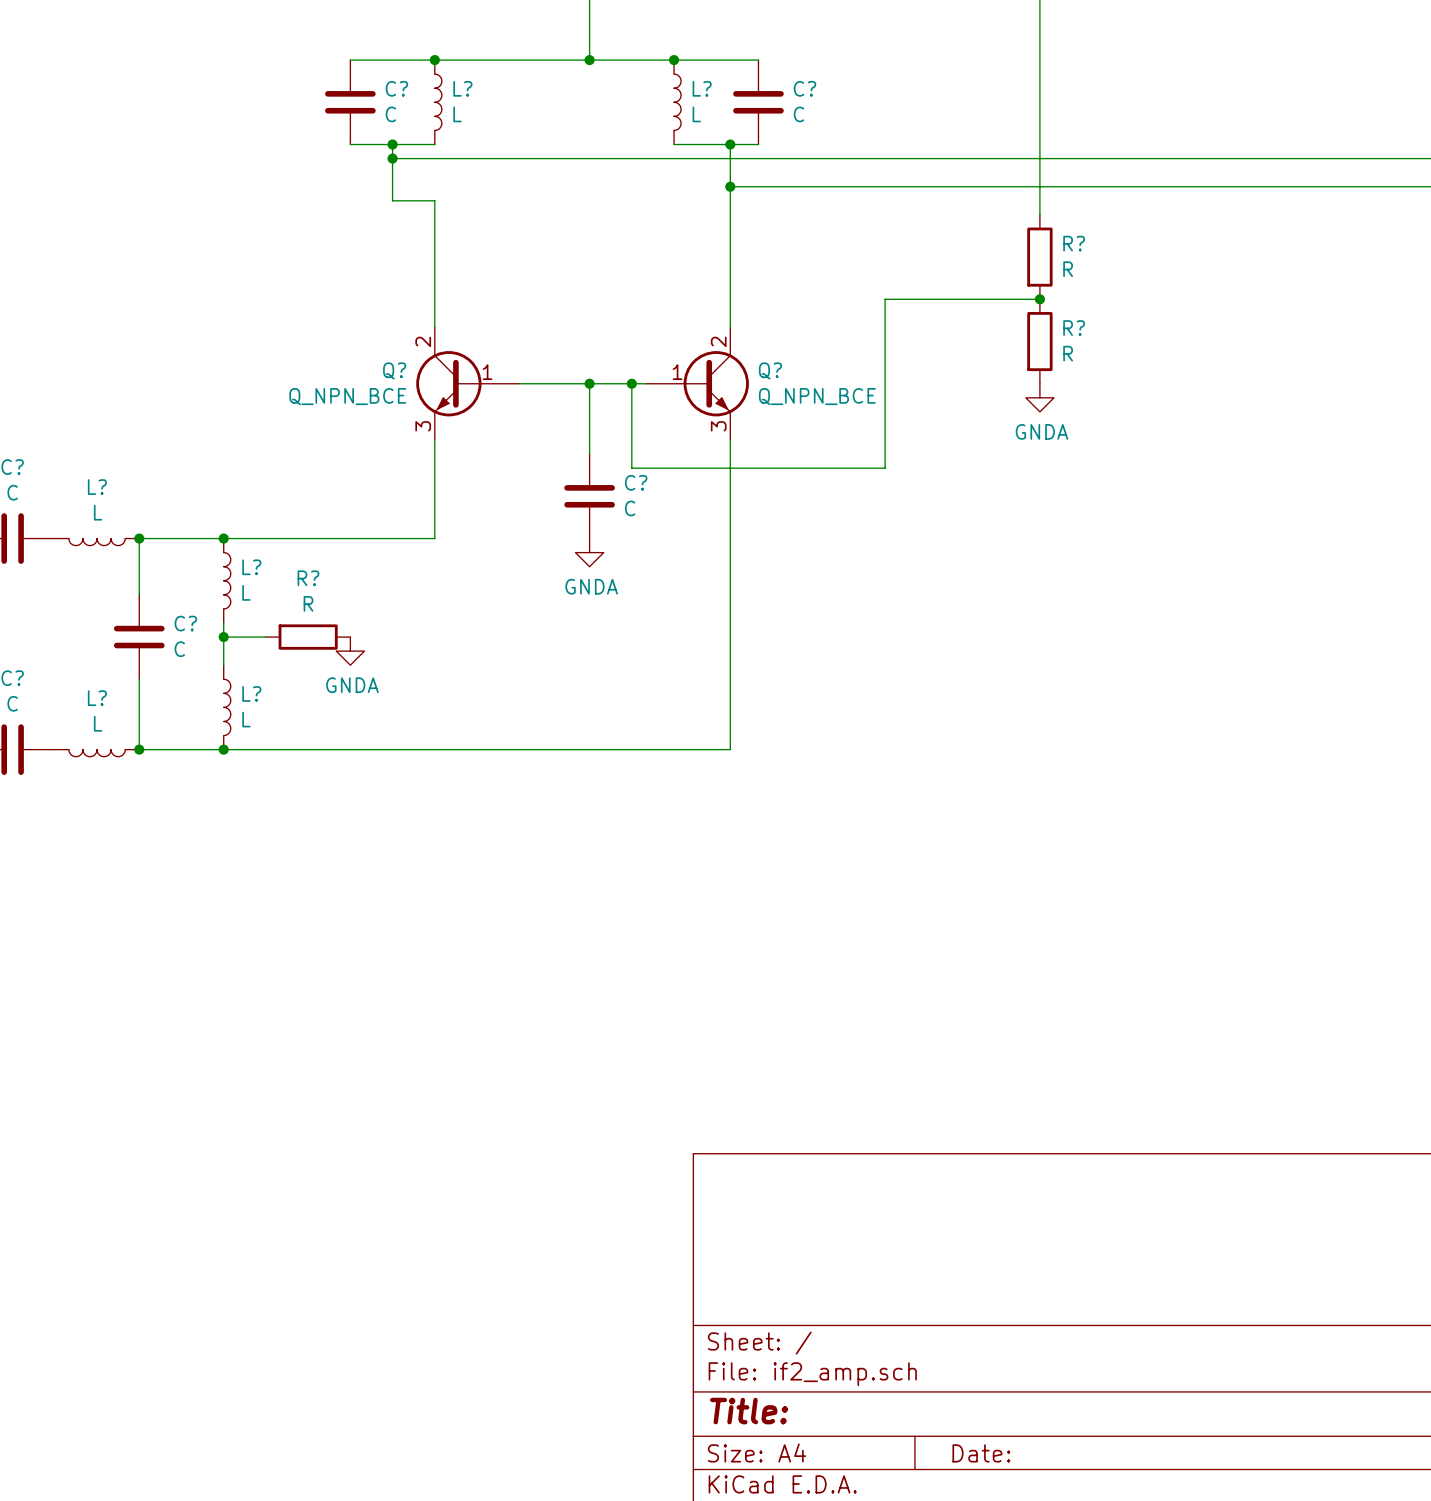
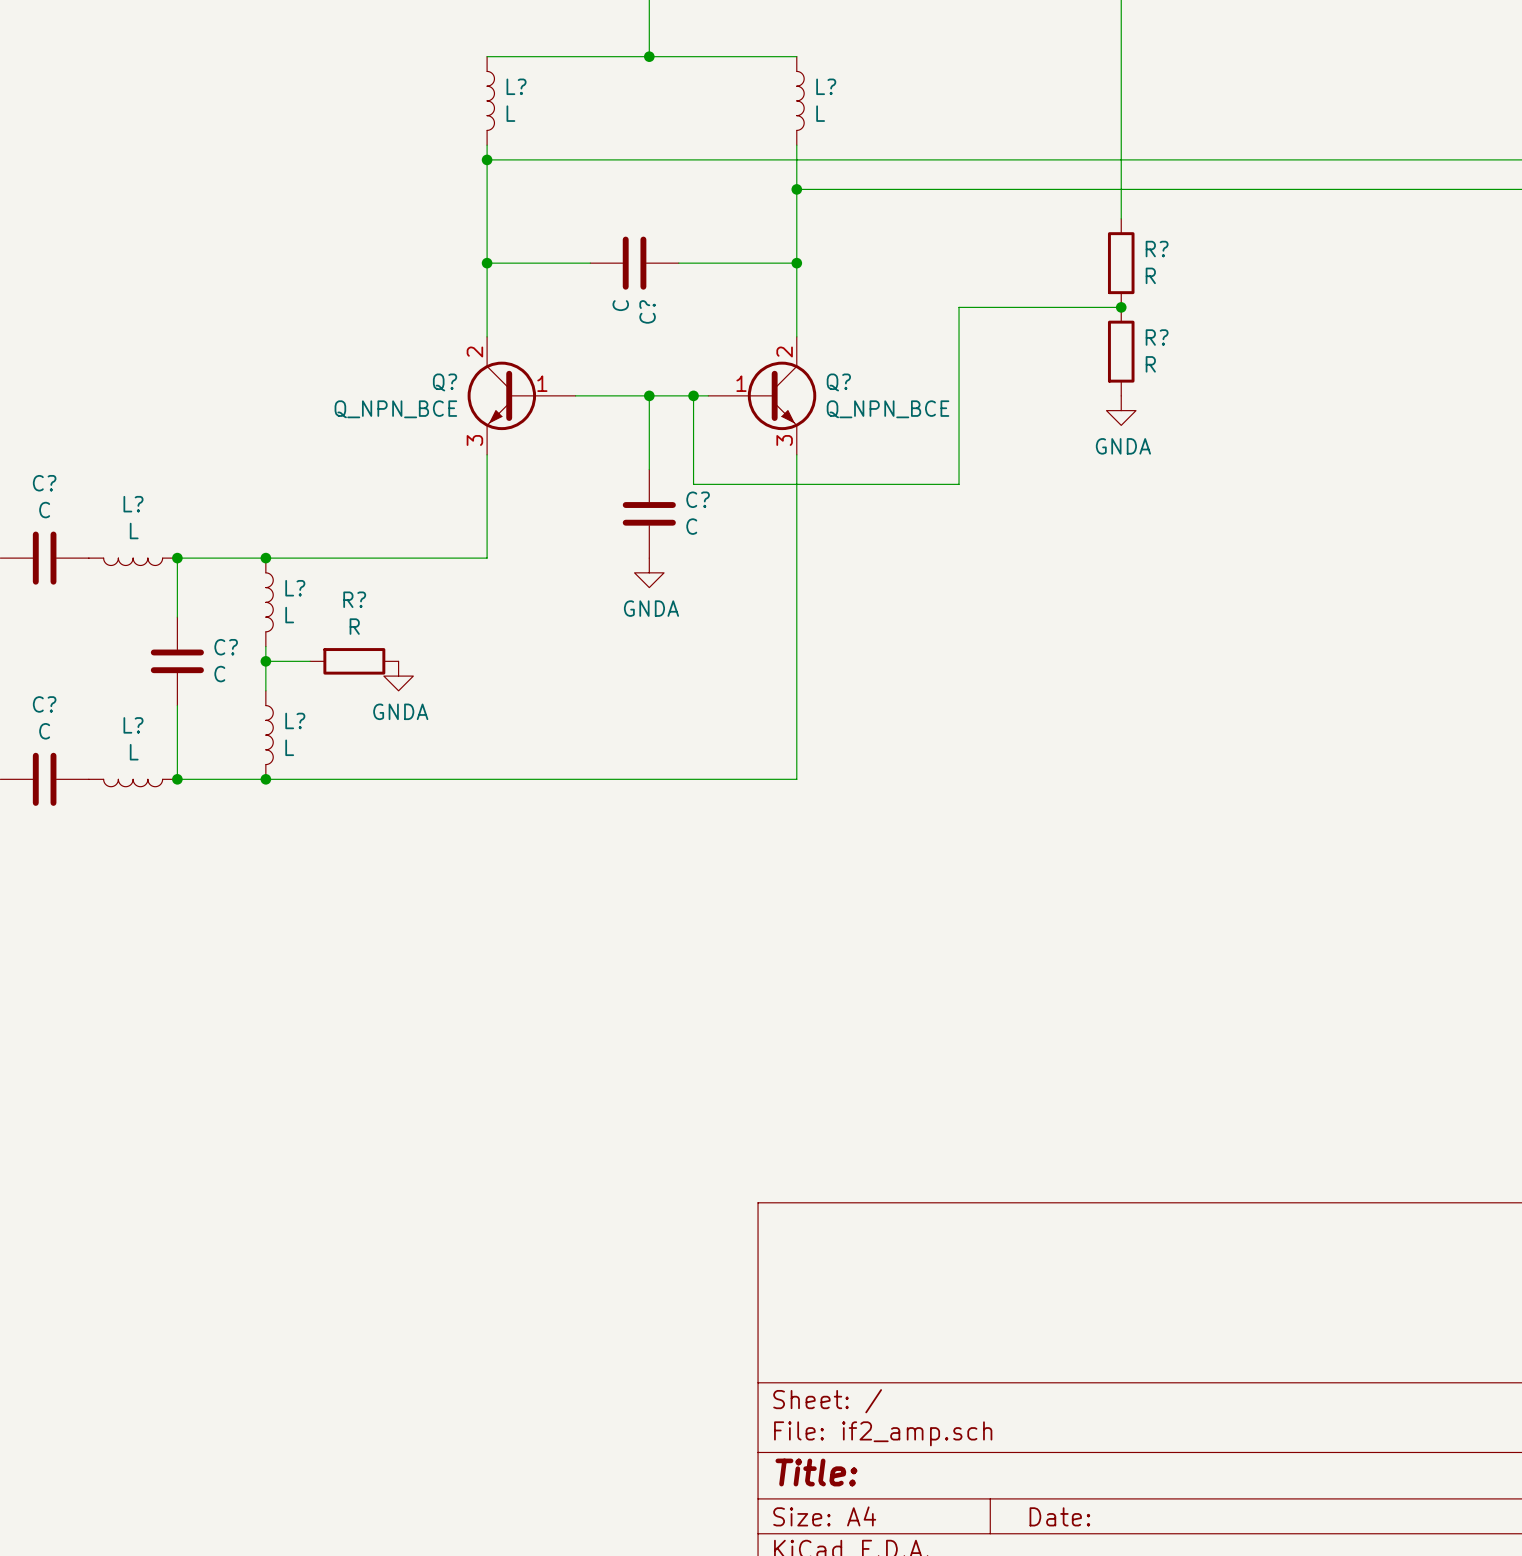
wire: (350, 60) (434, 60) -> none
junction: (434, 60) -> none
junction: (674, 60) -> none
wire: (730, 60) (758, 60) -> none
C?: C (350, 102) -> none
L? position: (677, 102) -> (800, 100)
C?: C (758, 102) -> none
wire: (350, 144) (434, 144) -> none
wire: (392, 144) (392, 200) (434, 200) -> (487, 145) (487, 204)
junction: (392, 144) -> none
wire: (674, 144) (758, 144) -> none
junction: (730, 144) -> none
wire: (392, 158) (434, 158) -> none
junction: (392, 158) -> none
junction: none -> (487, 159)
wire: none -> (487, 263) (590, 263)
junction: none -> (487, 263)
C?: none -> C (634, 263)
wire: none -> (678, 263) (796, 263)
junction: none -> (796, 263)

